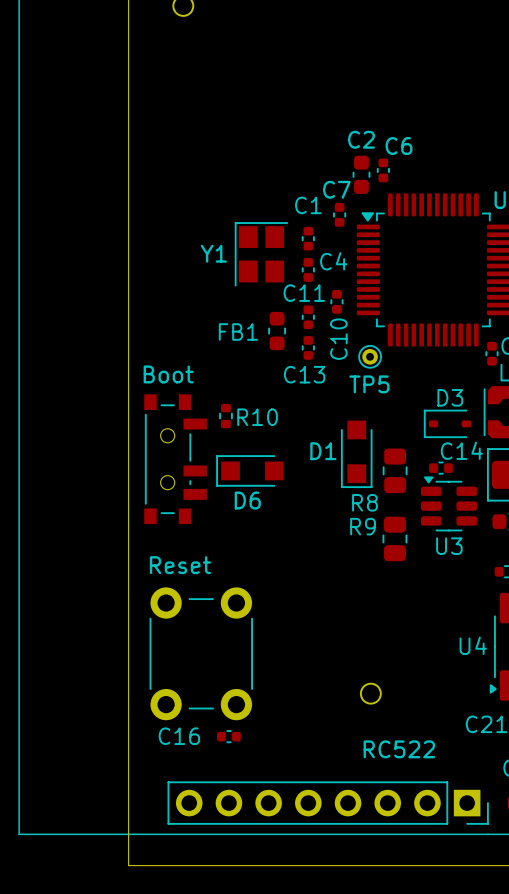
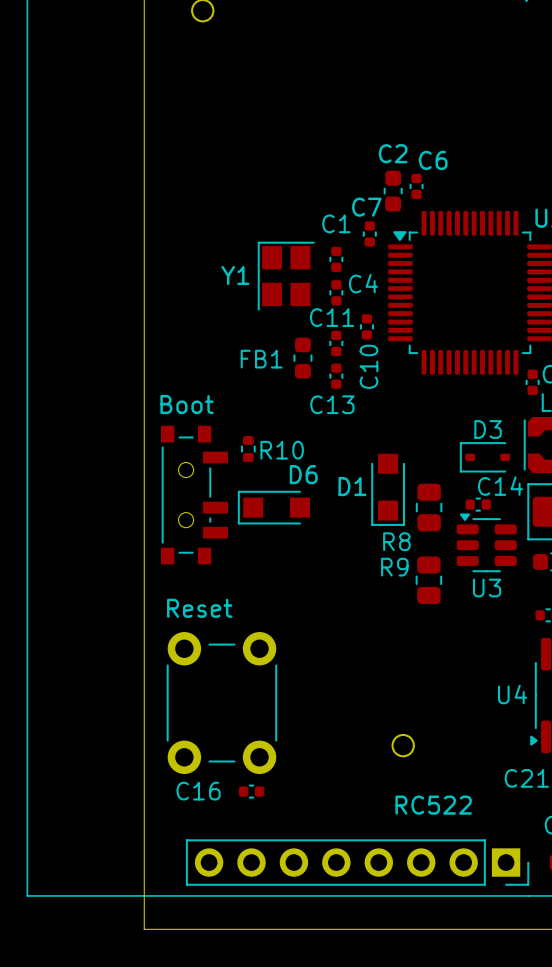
TP5: (370, 356) -> none
D6 name position: D6 (247, 500) -> D6 (303, 474)

